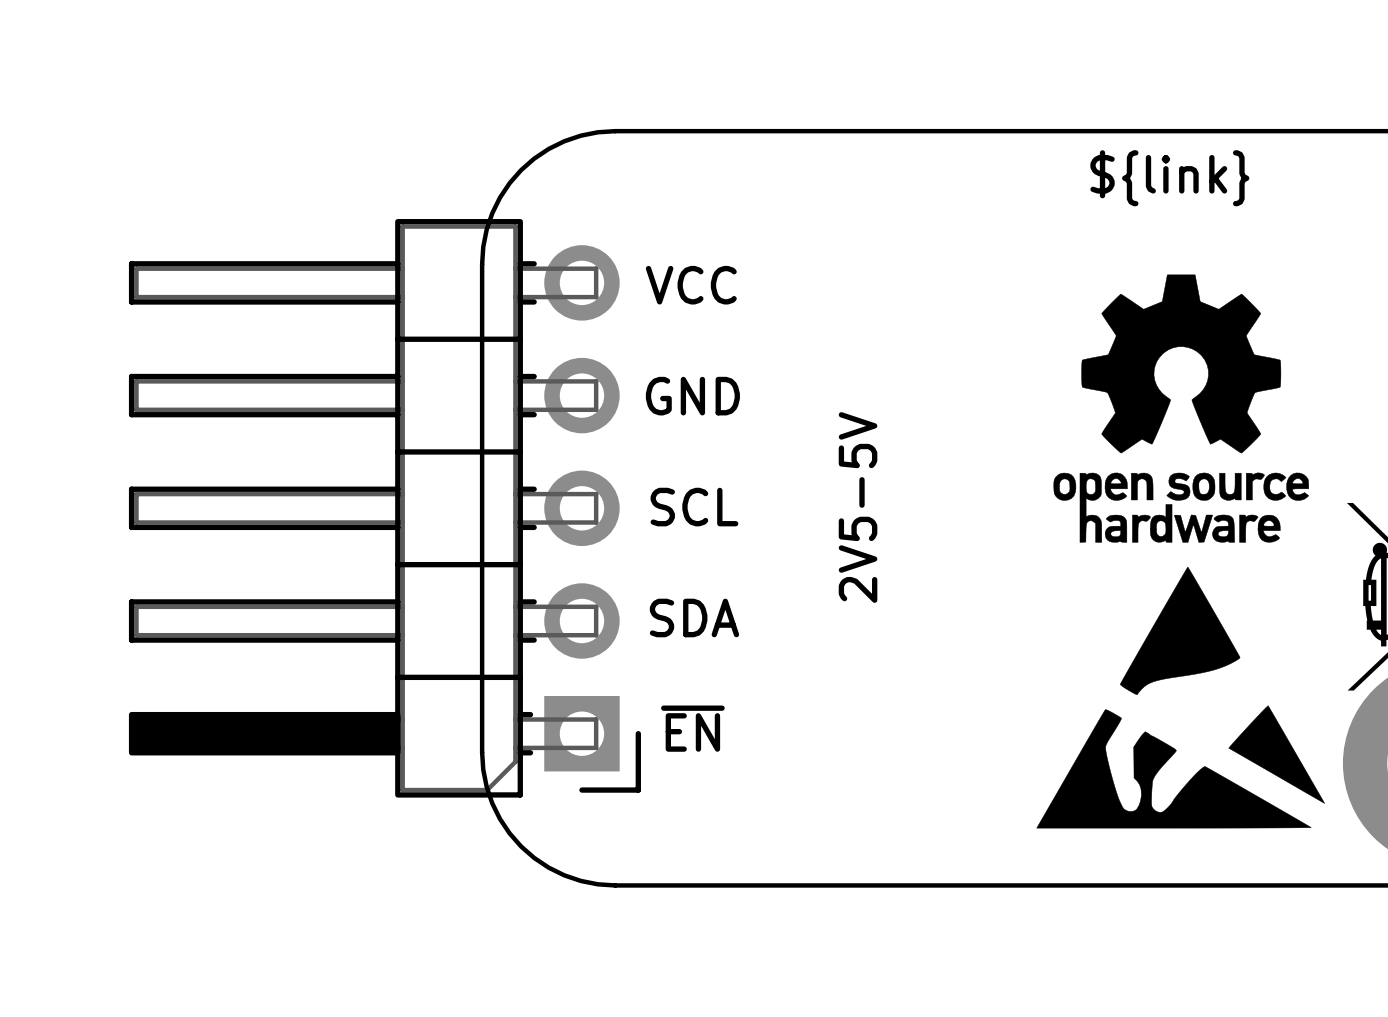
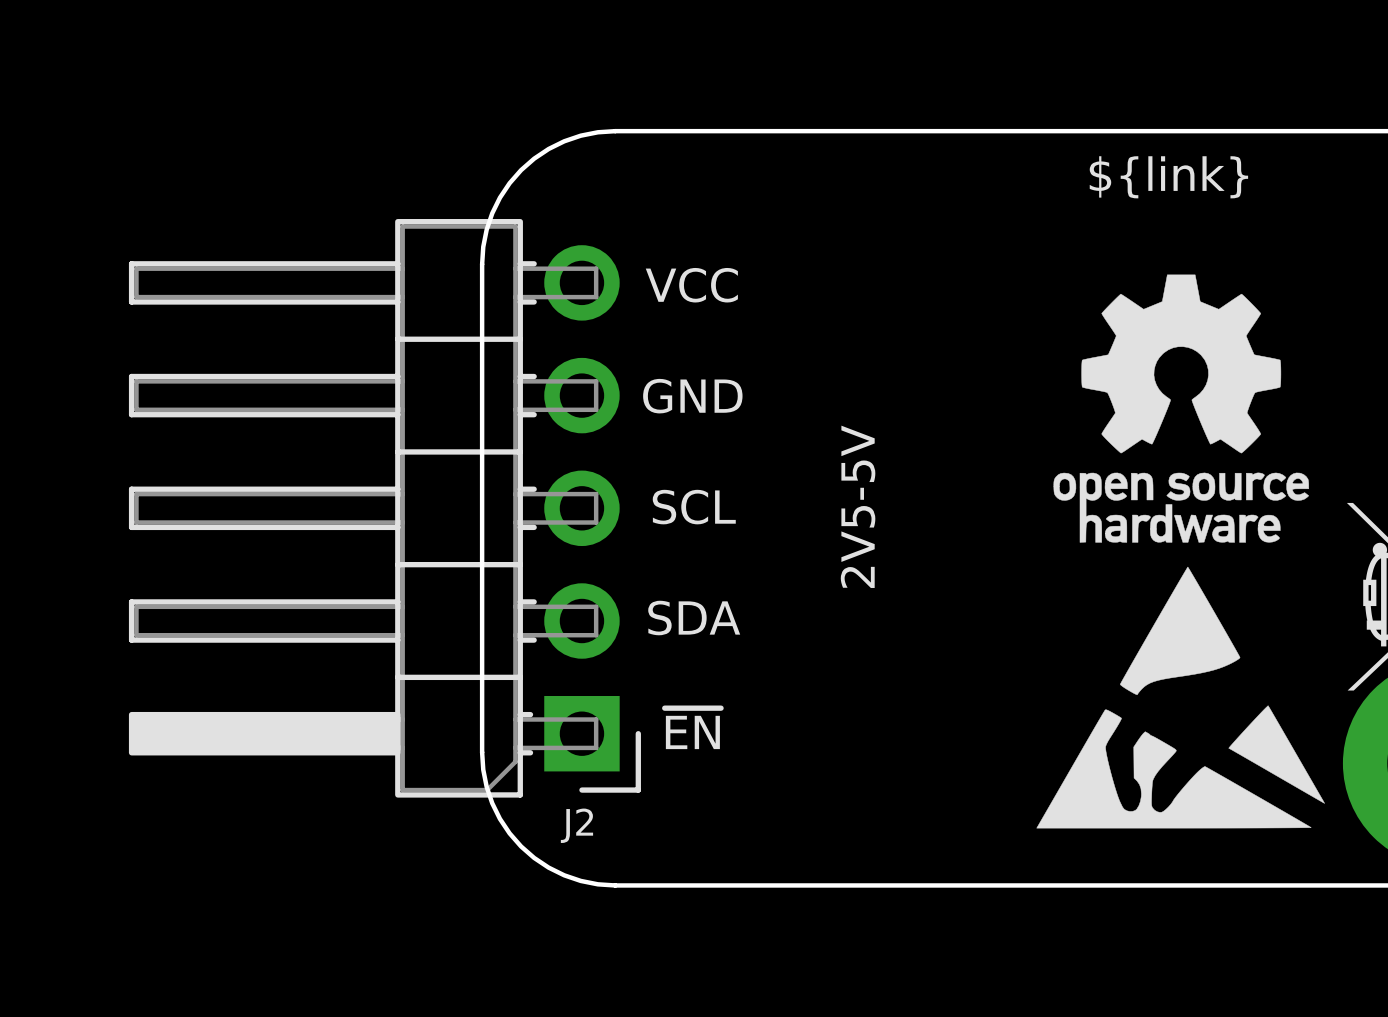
J2 name: none -> J2 (576, 825)

